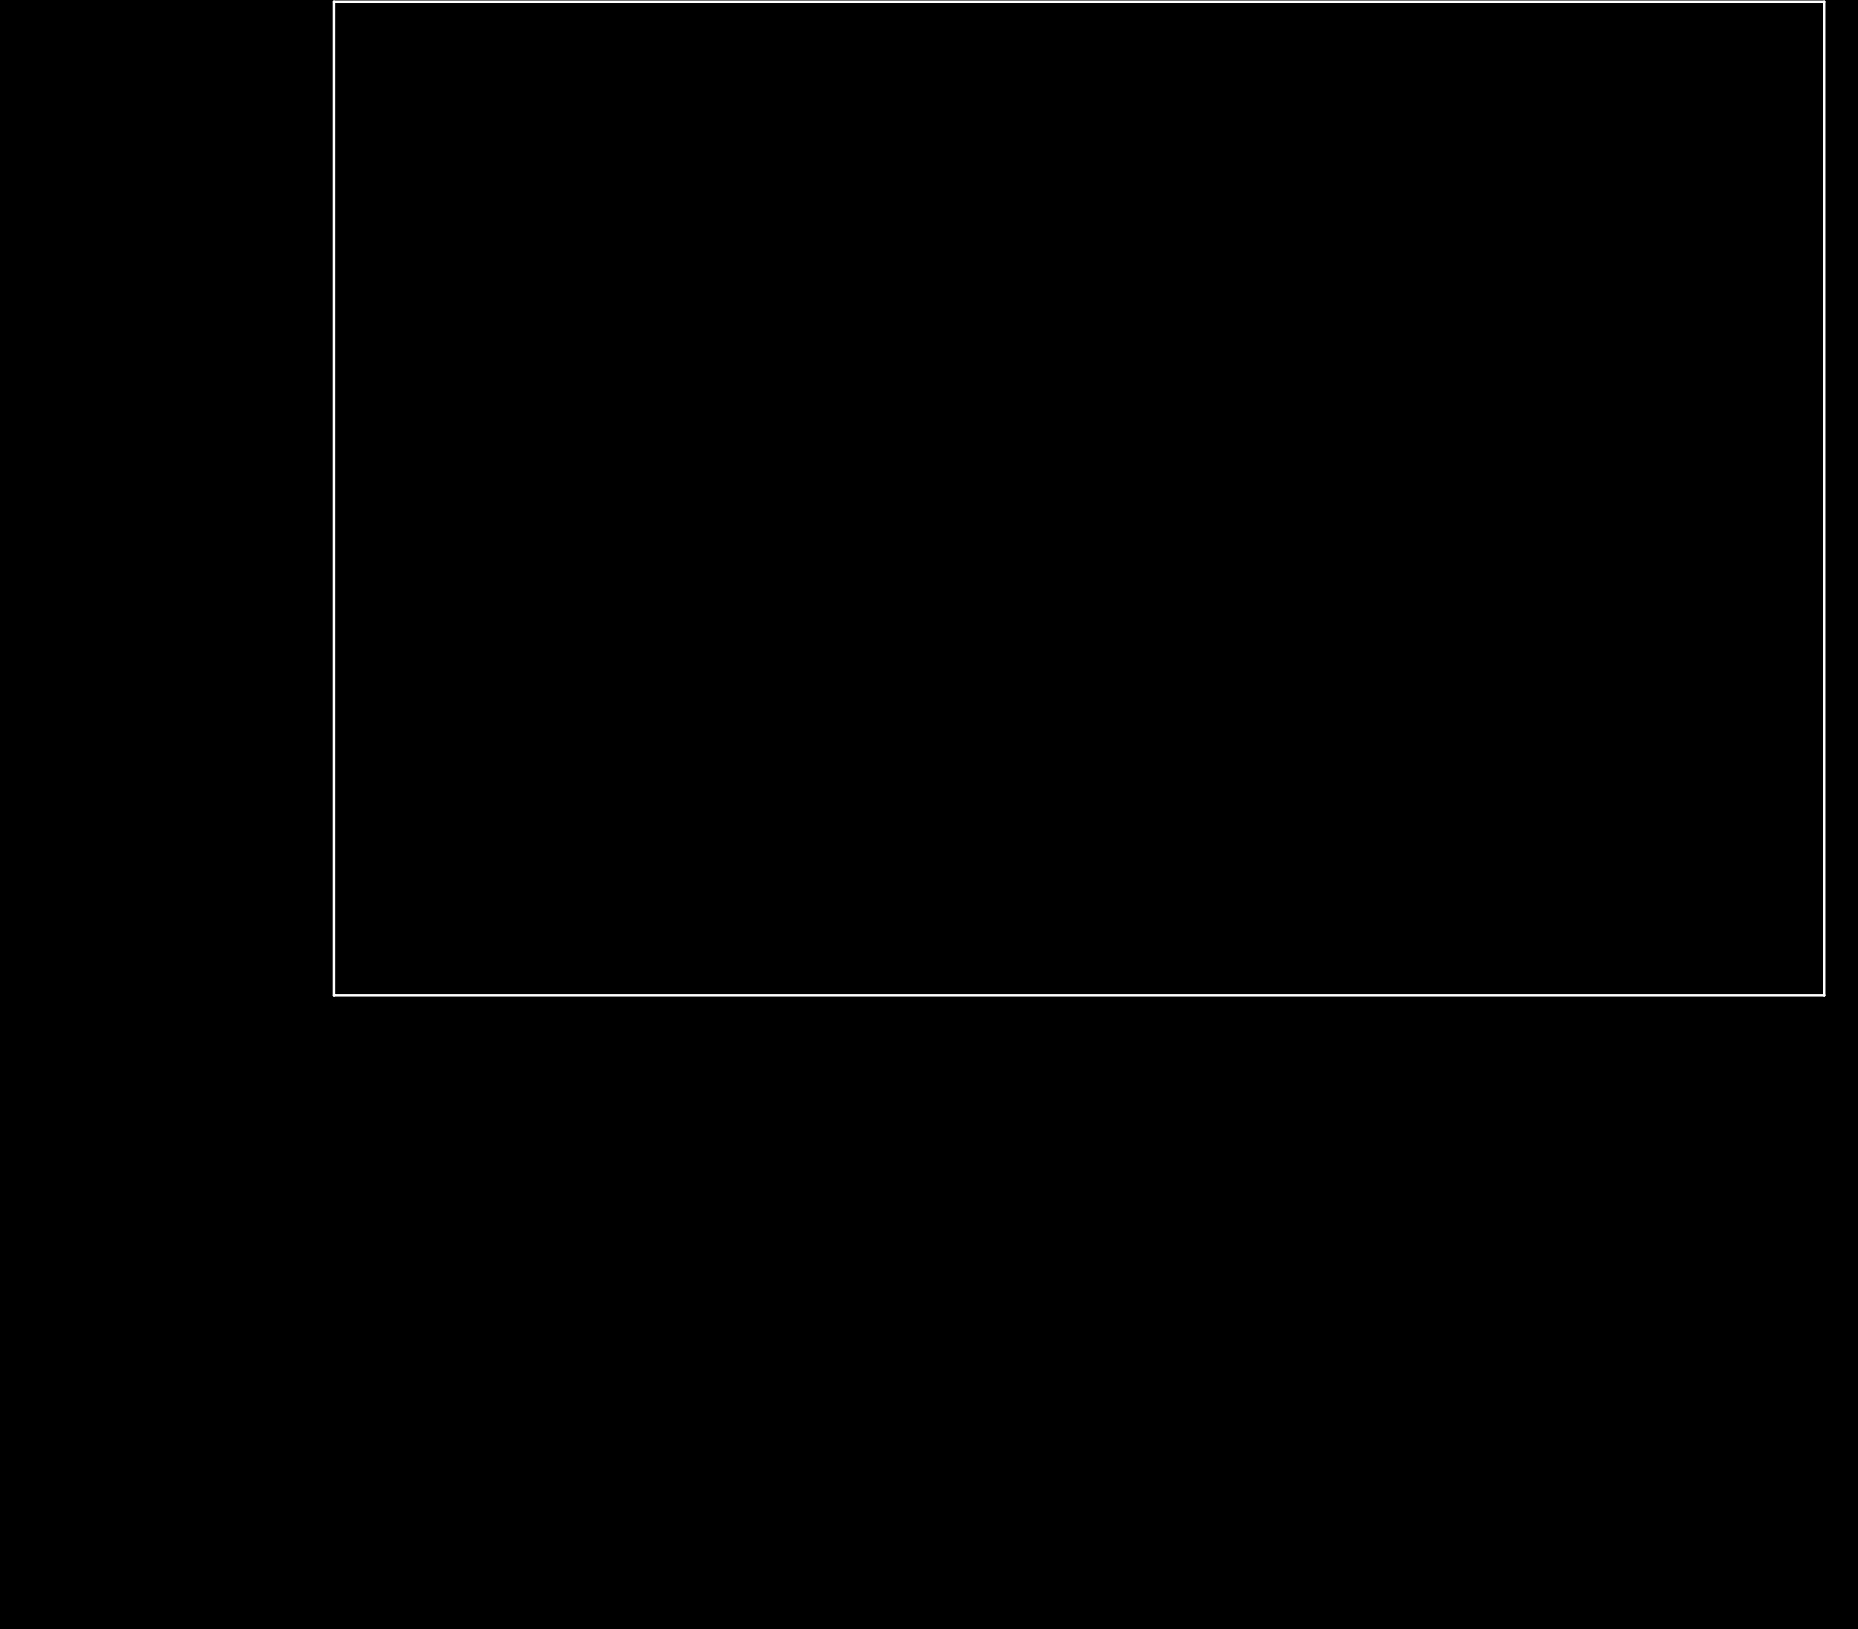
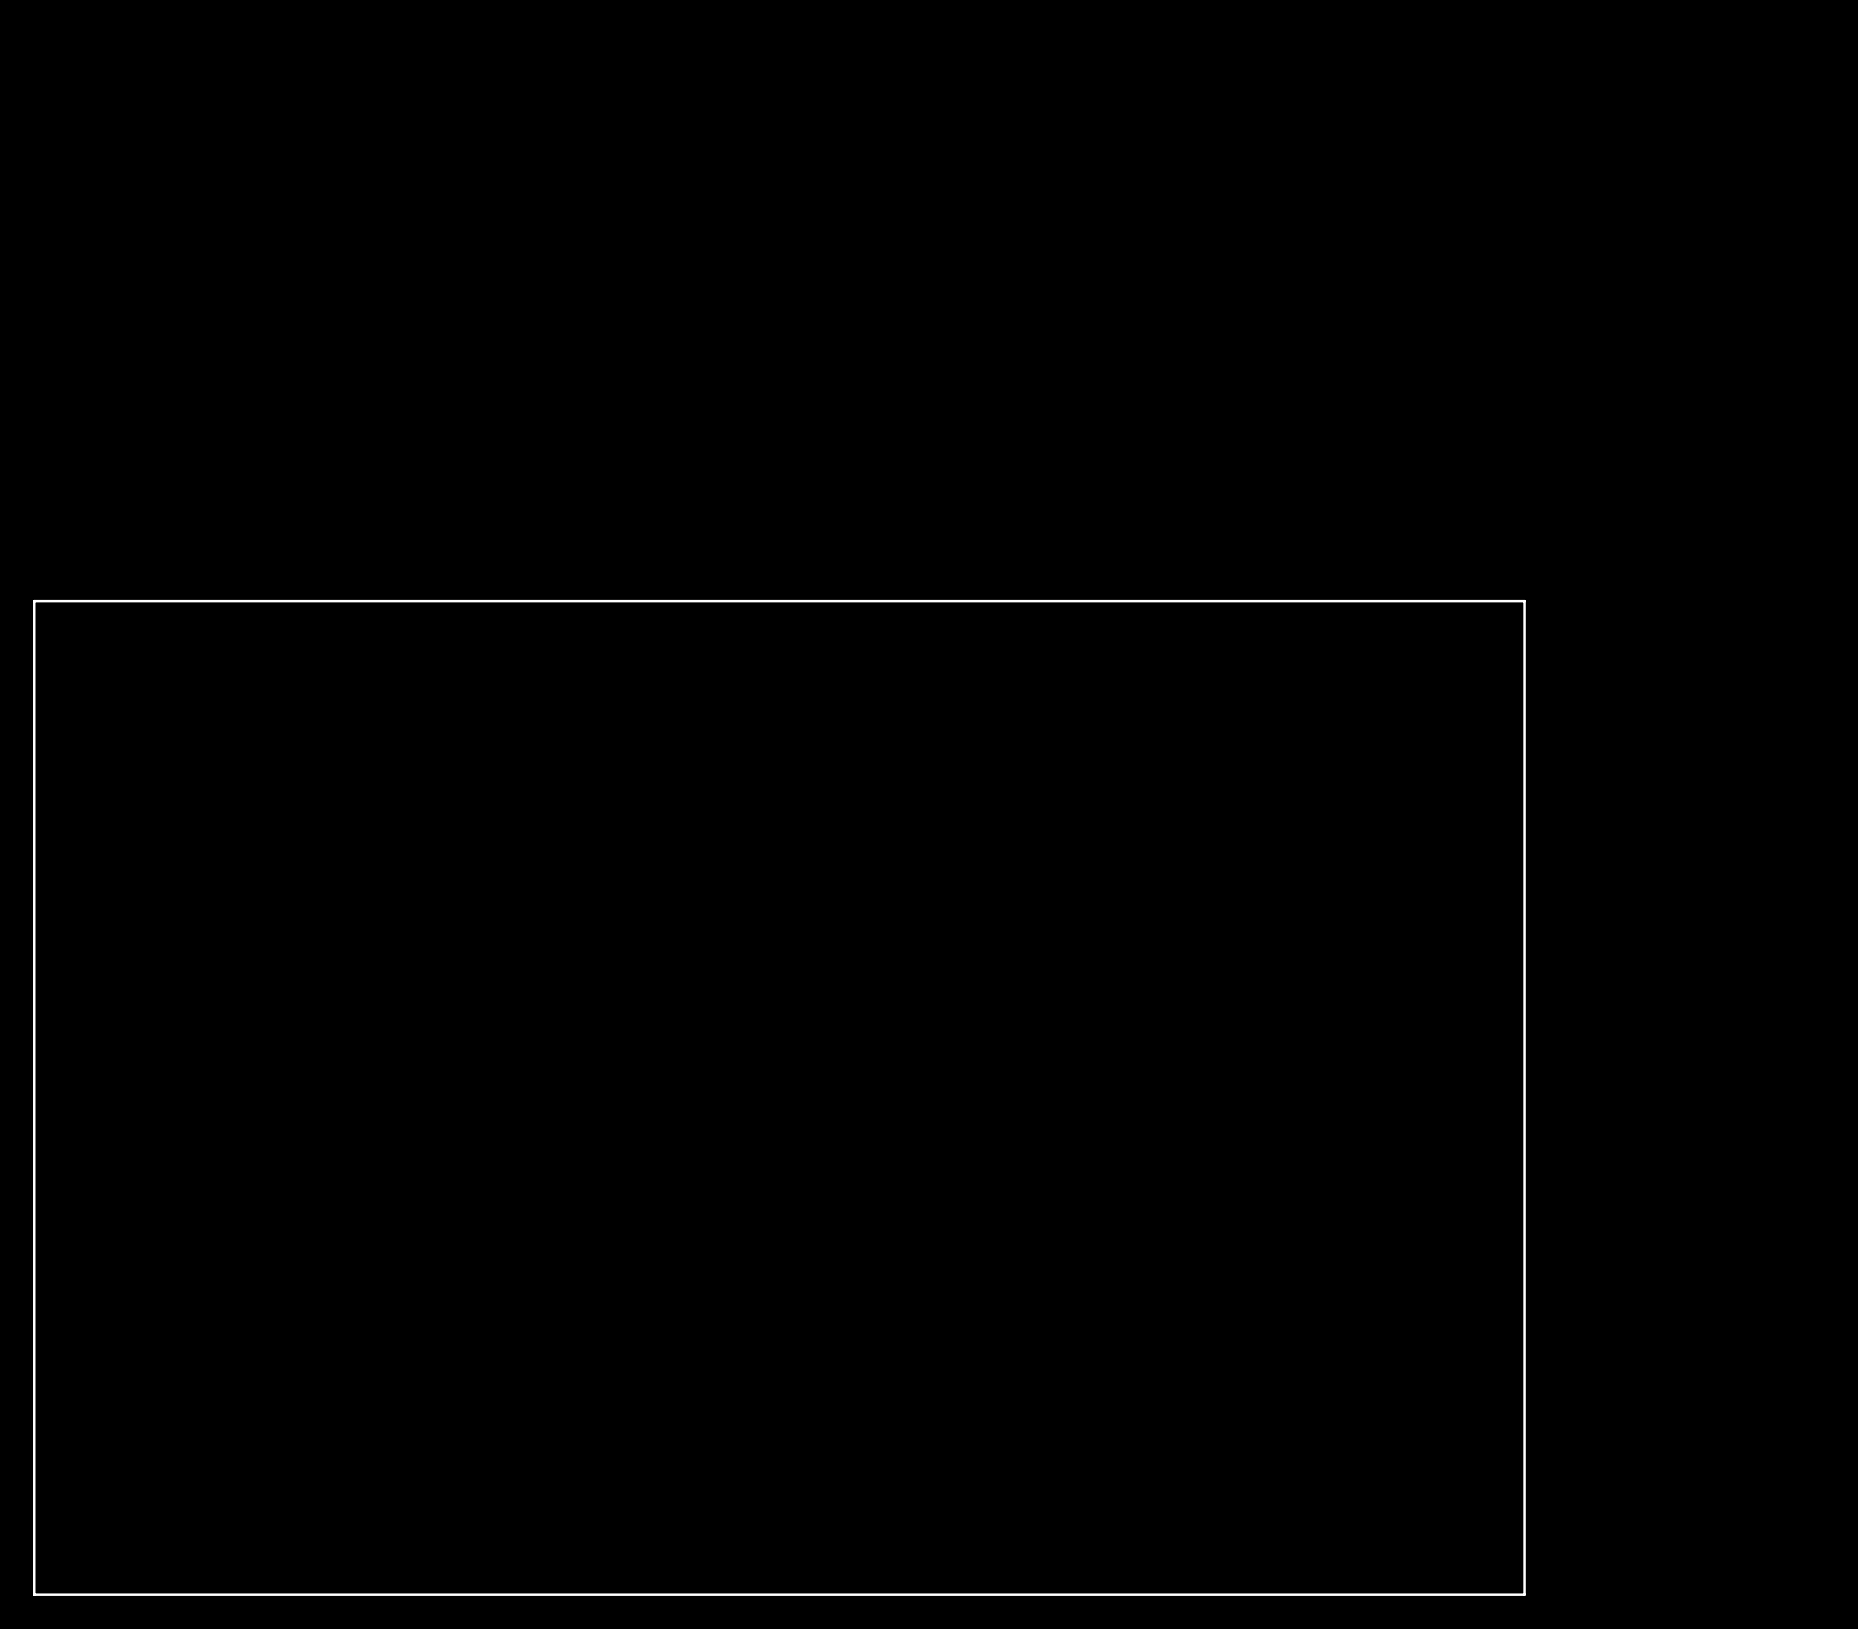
board edge: (1824, 1) (333, 1) (333, 995) (1824, 995) (1824, 1) -> none
board edge: none -> (1524, 601) (34, 601) (34, 1594) (1524, 1594) (1524, 601)

